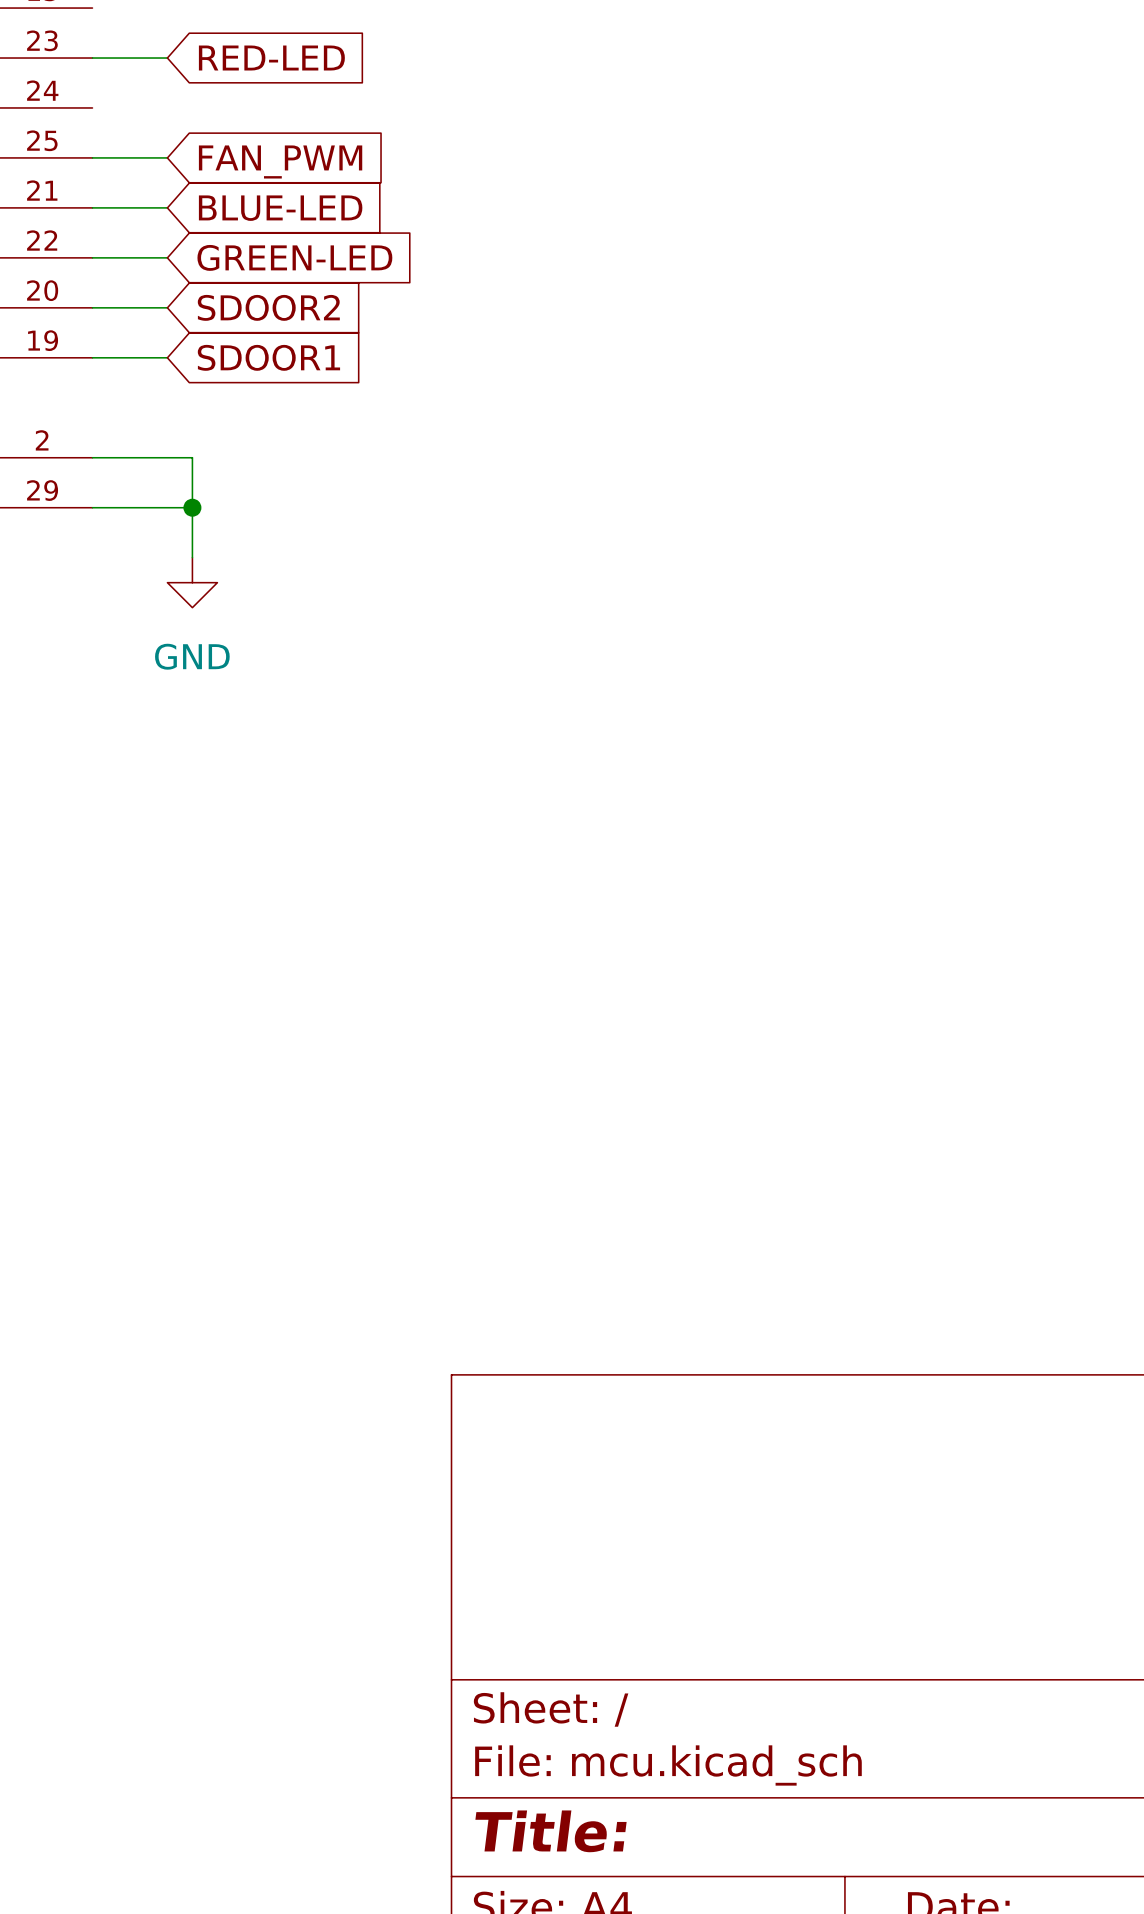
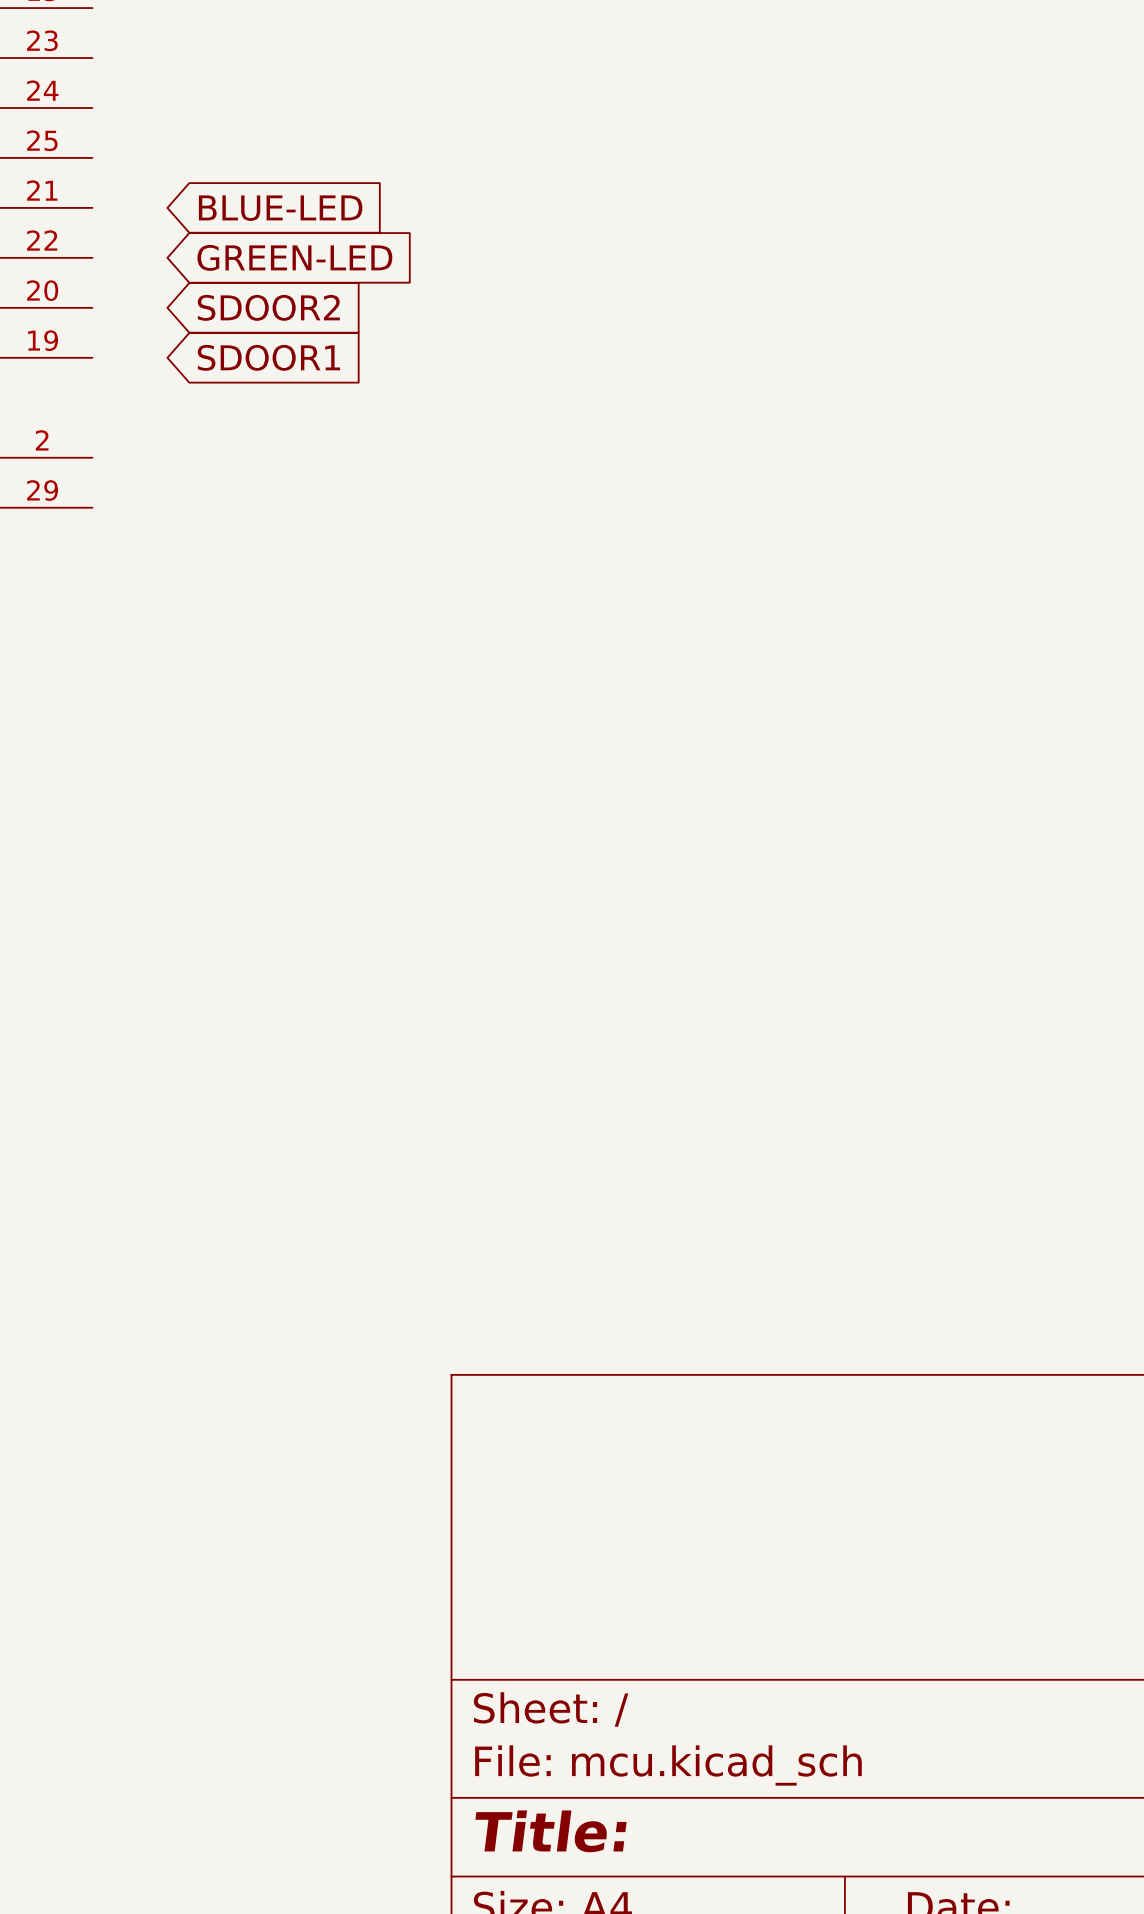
wire: (92, 58) (167, 58) -> none
global label: RED-LED (271, 58) -> none
wire: (92, 157) (167, 157) -> none
global label: FAN_PWM (280, 161) -> none
wire: (92, 207) (167, 207) -> none
wire: (92, 257) (167, 257) -> none
wire: (92, 307) (167, 307) -> none
wire: (92, 357) (167, 357) -> none
wire: (92, 457) (192, 457) (192, 557) -> none
wire: (92, 507) (192, 507) -> none
junction: (192, 507) -> none
power symbol: GND (192, 582) -> none

